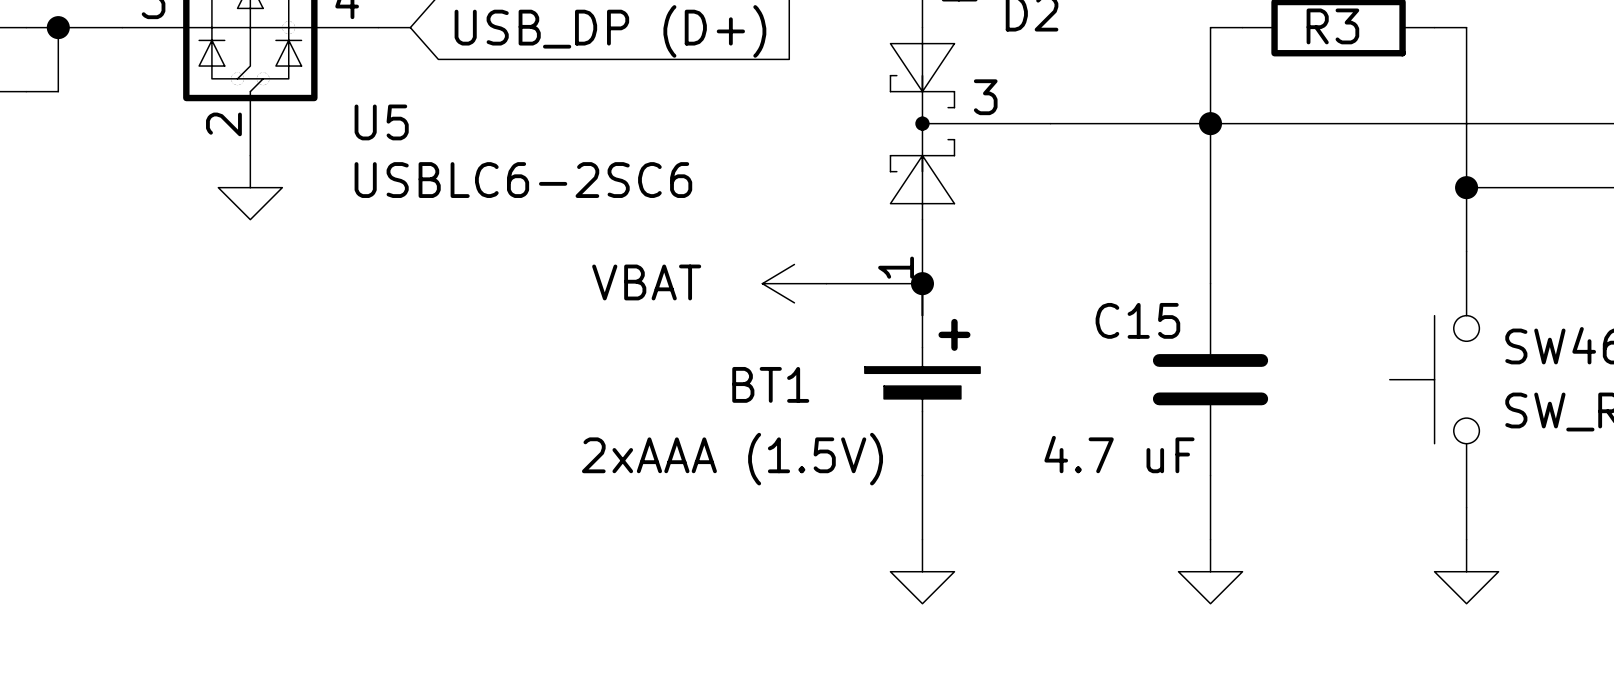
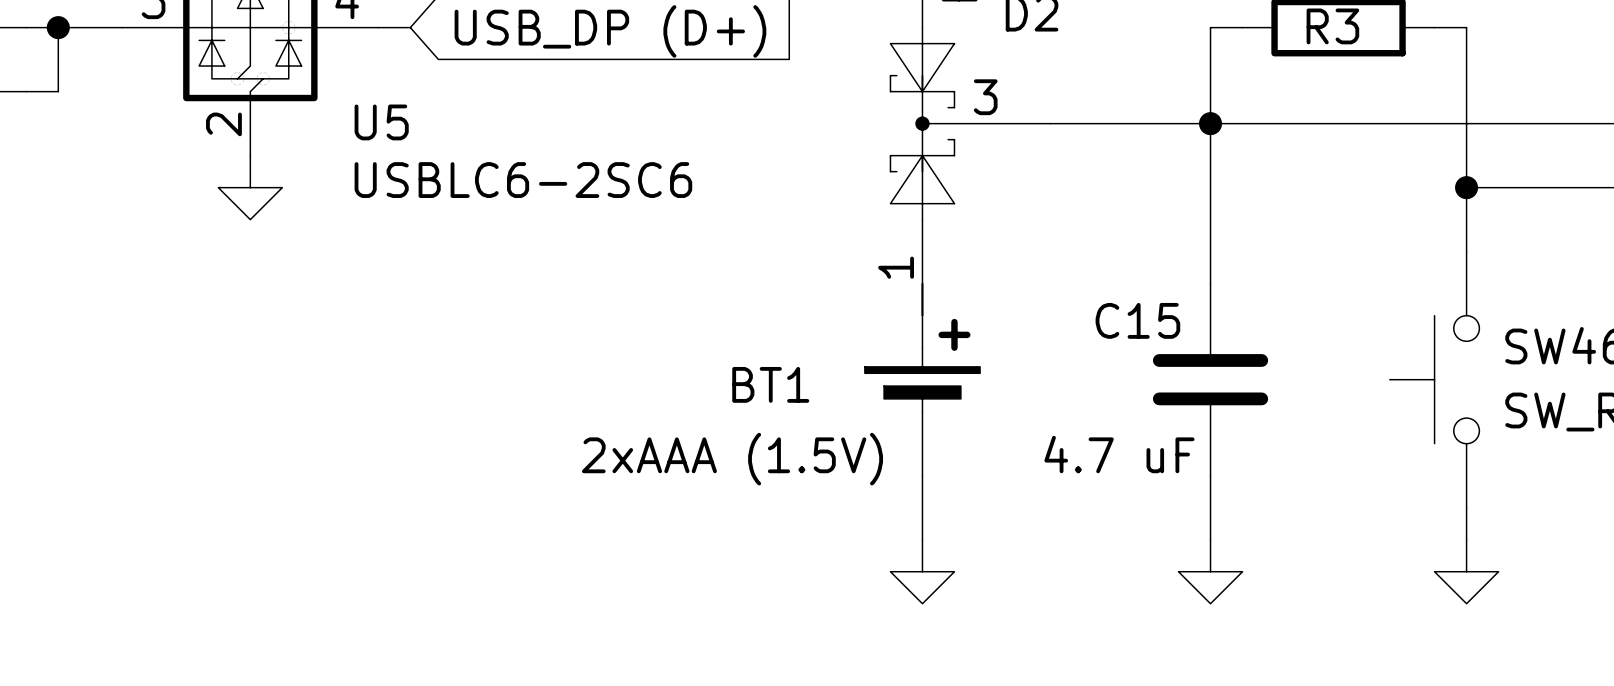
power symbol: VBAT (794, 283) -> none
wire: (826, 283) (922, 283) -> none
junction: (922, 283) -> none

